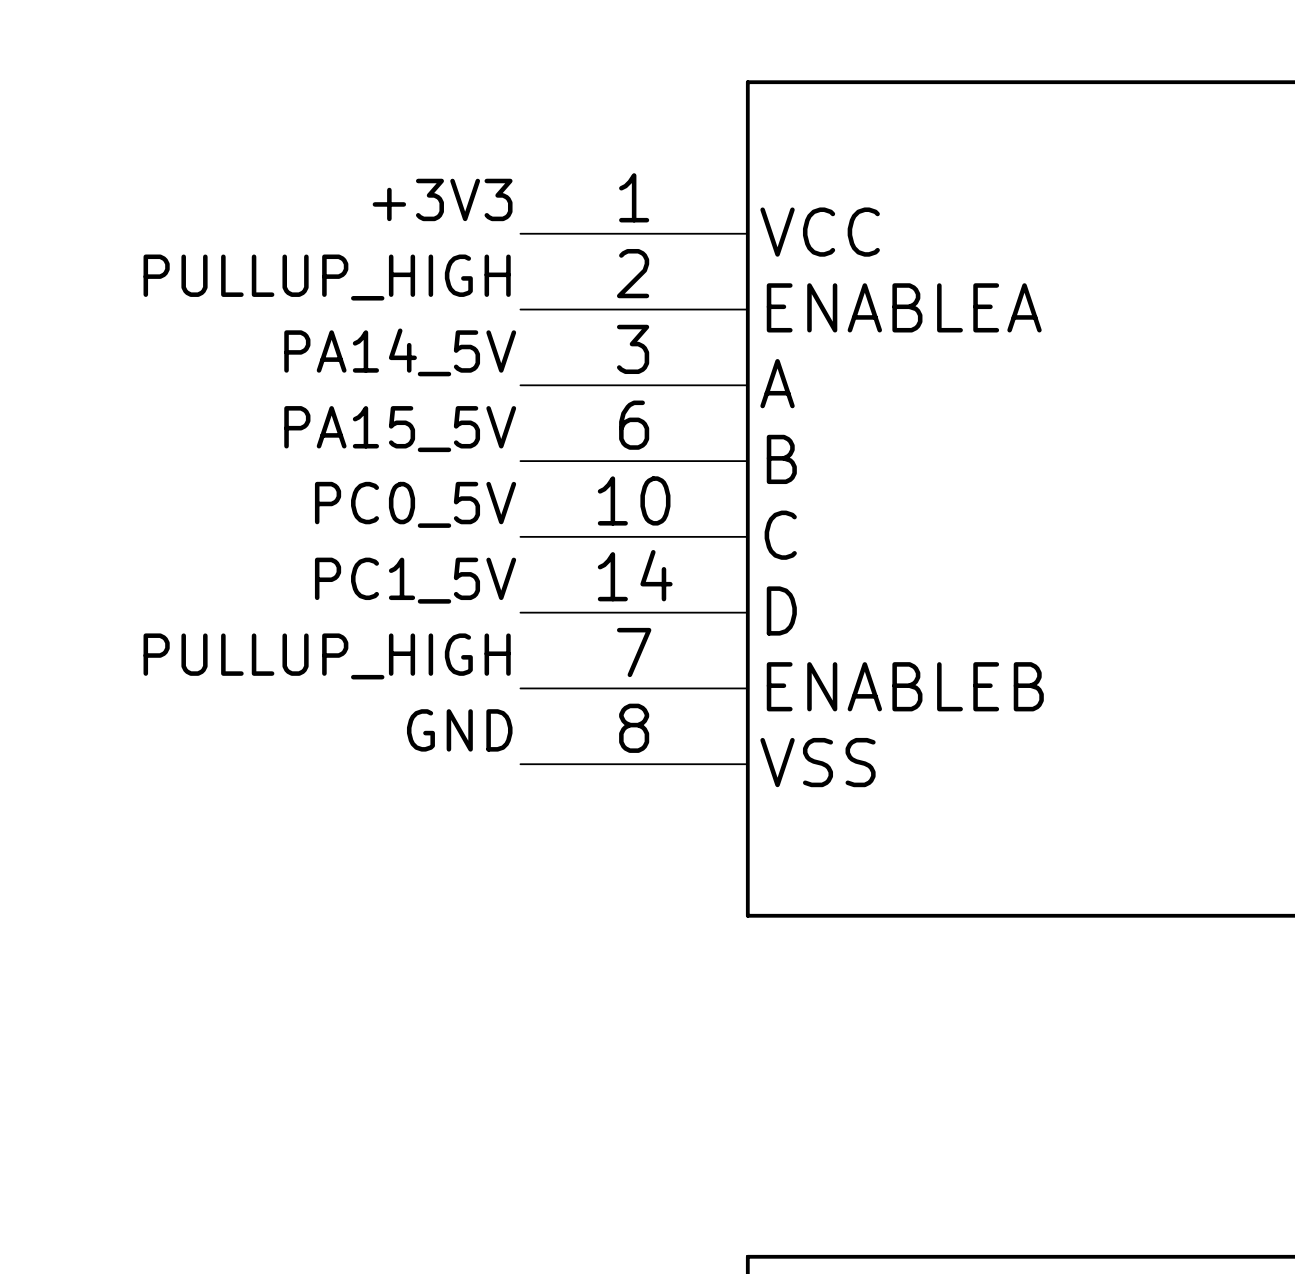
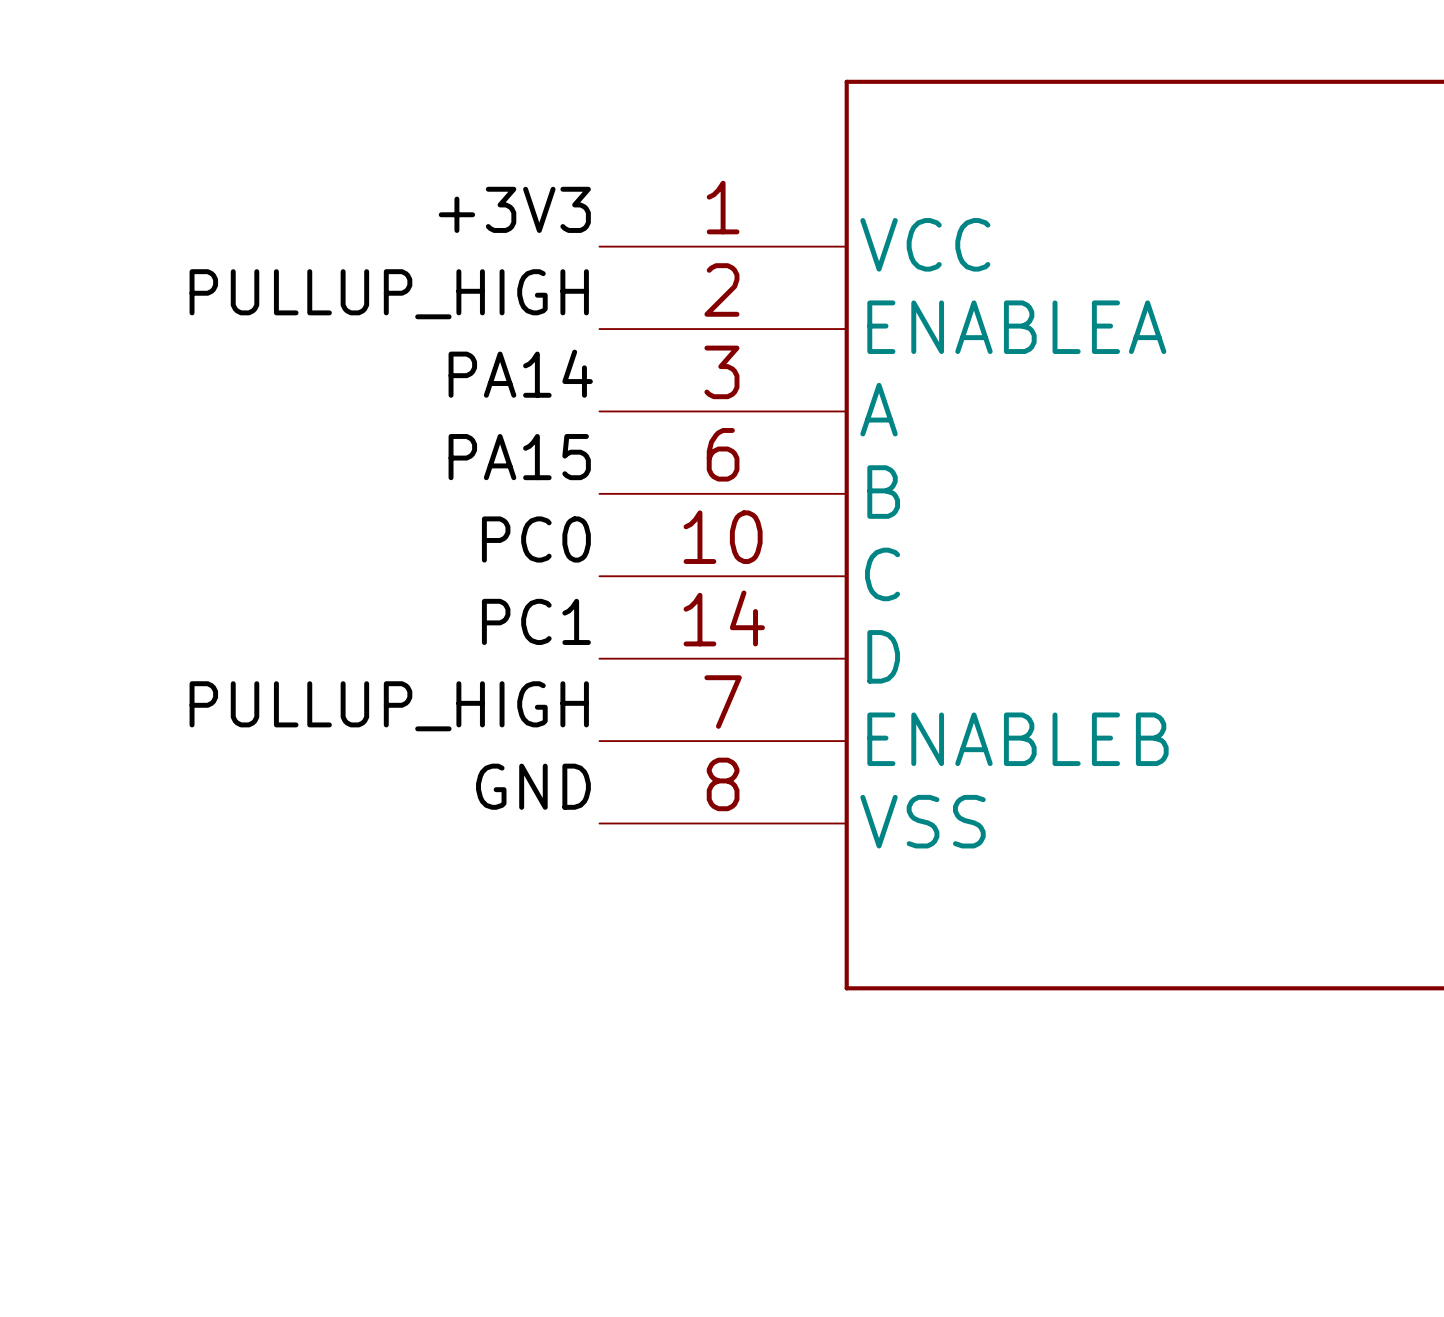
label: PA14_5V (400, 352) -> PA14 (520, 373)
label: PA15_5V (400, 429) -> PA15 (519, 457)
label: PC0_5V (415, 504) -> PC0 (536, 539)
label: PC1_5V (415, 580) -> PC1 (536, 621)

